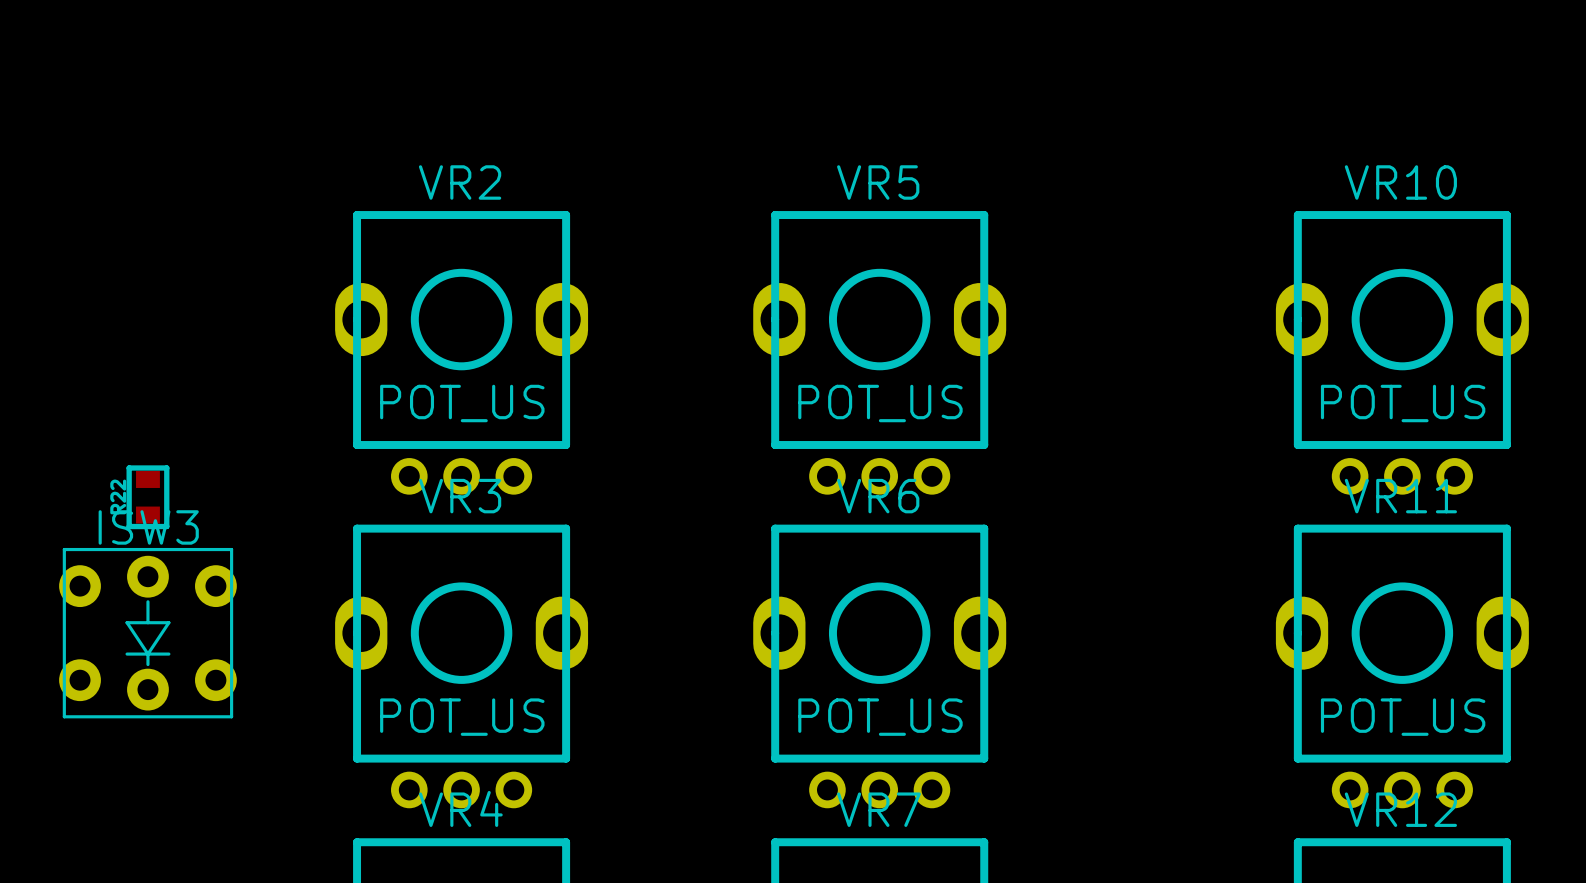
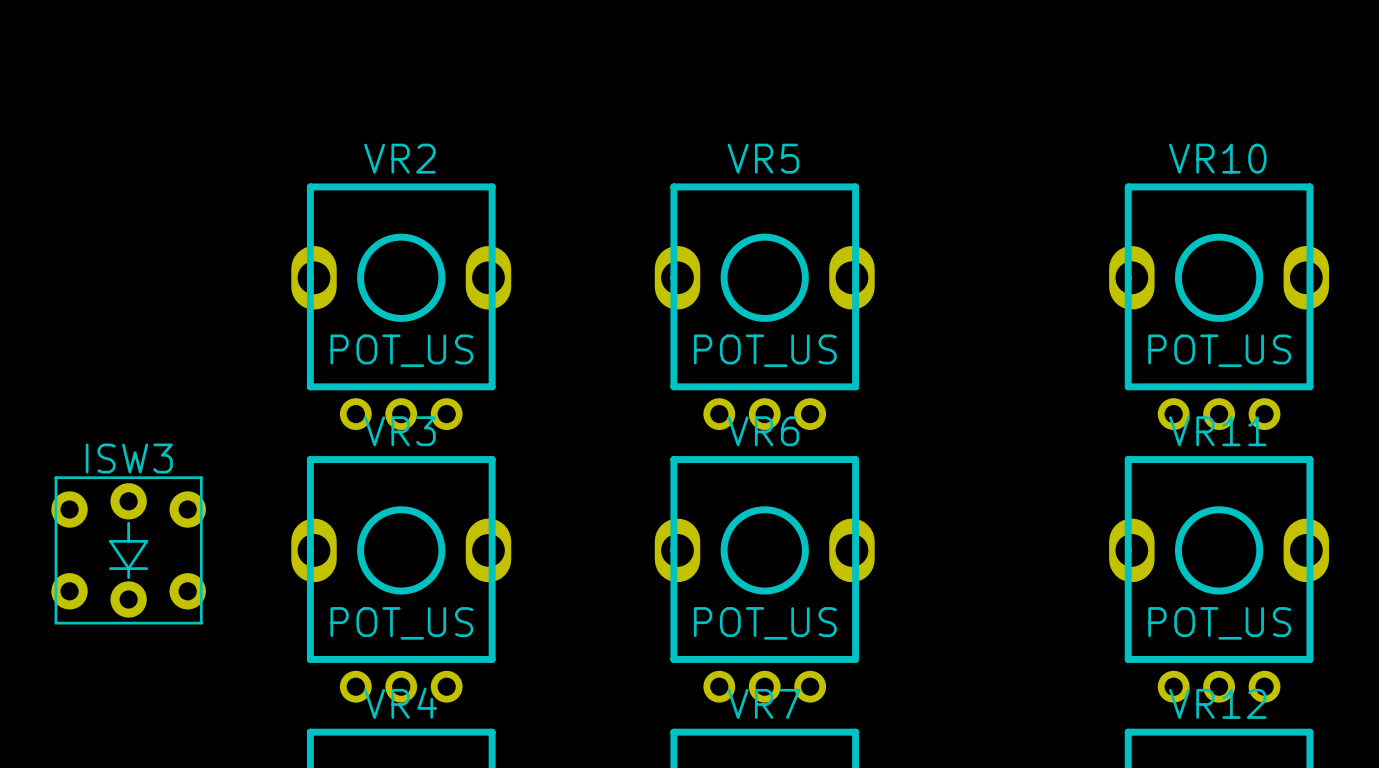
R22: (147, 497) -> none

